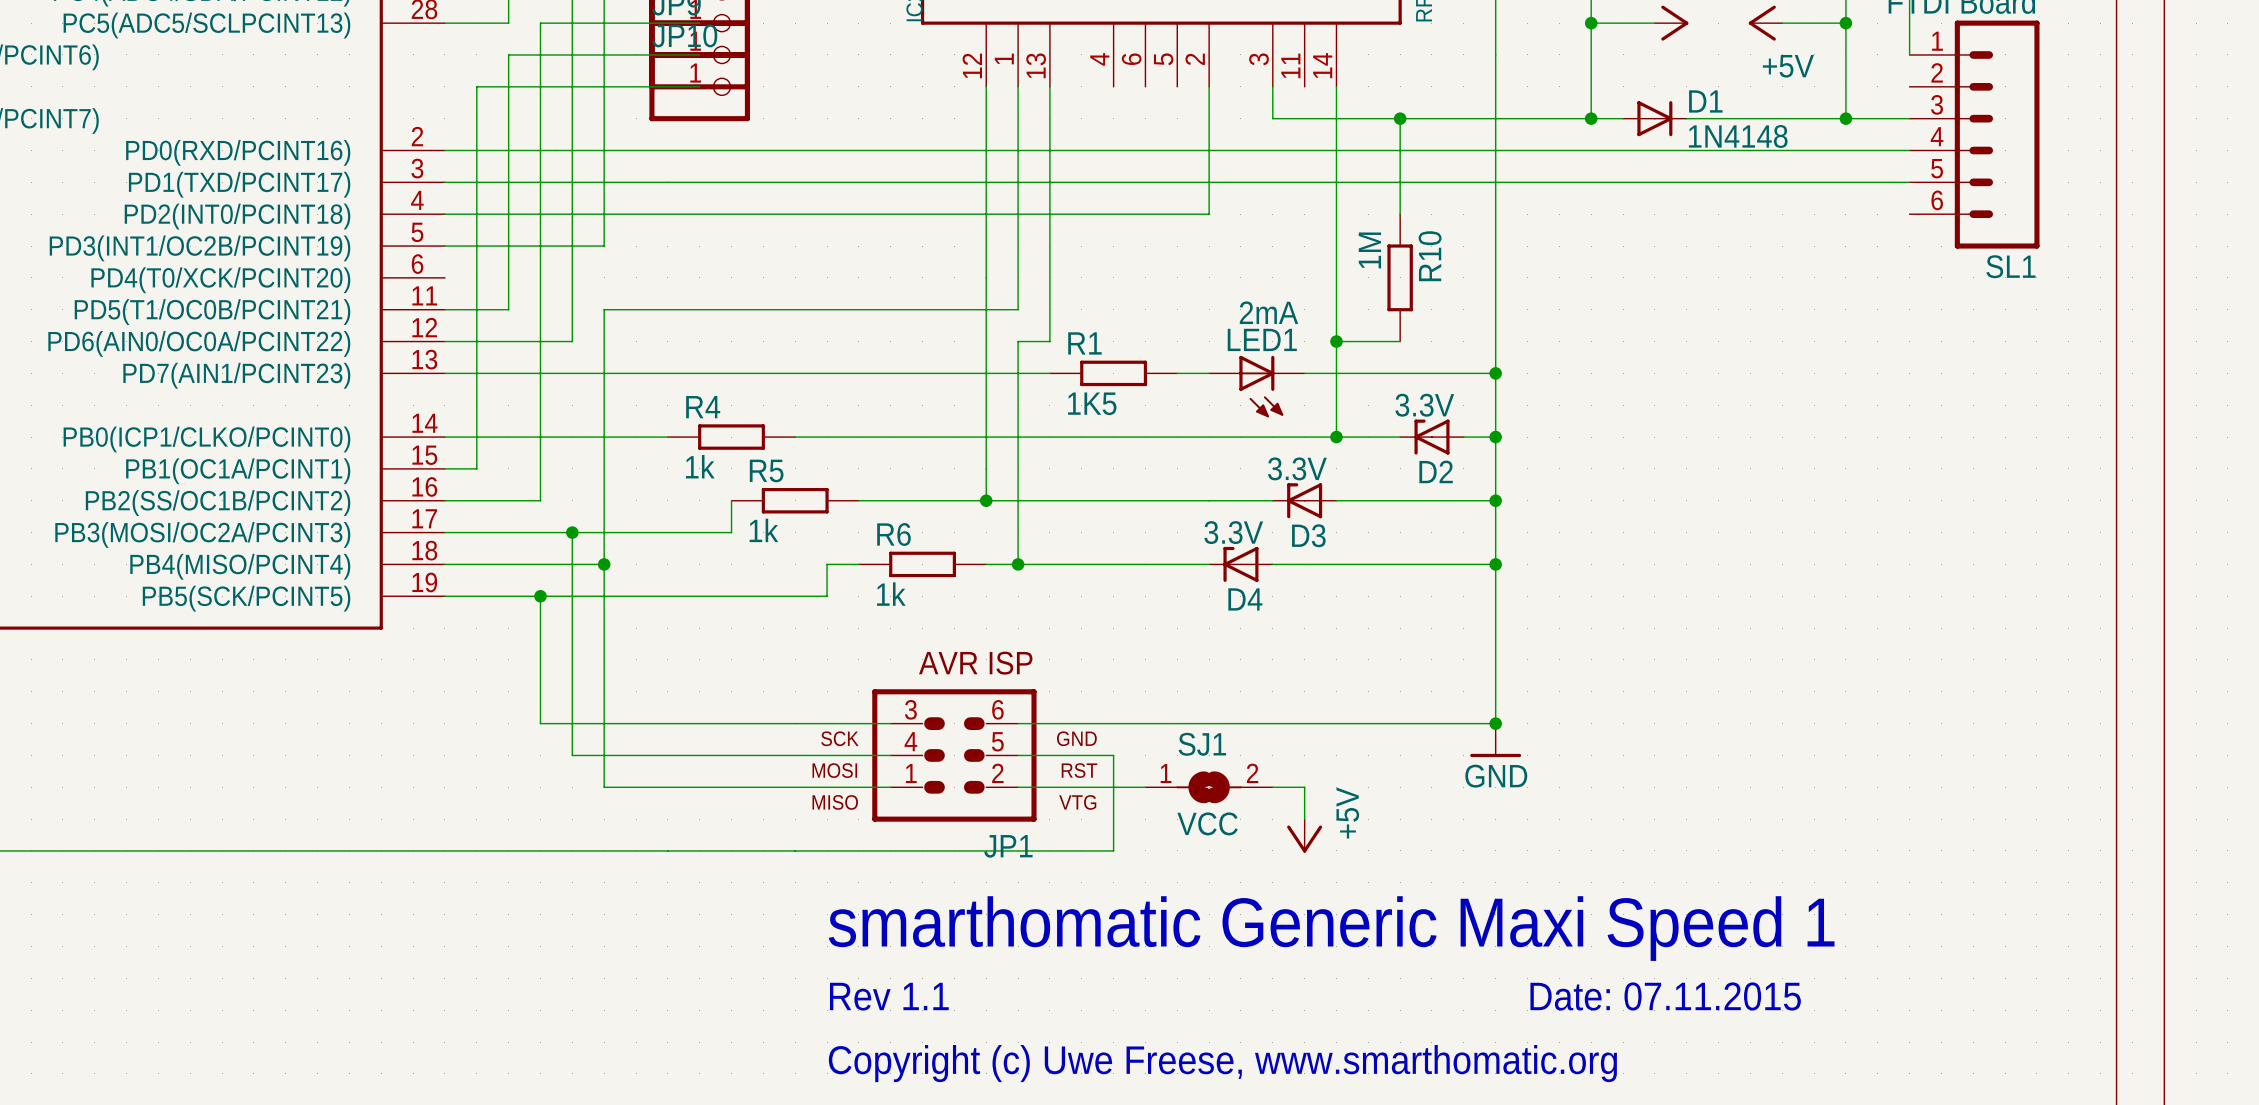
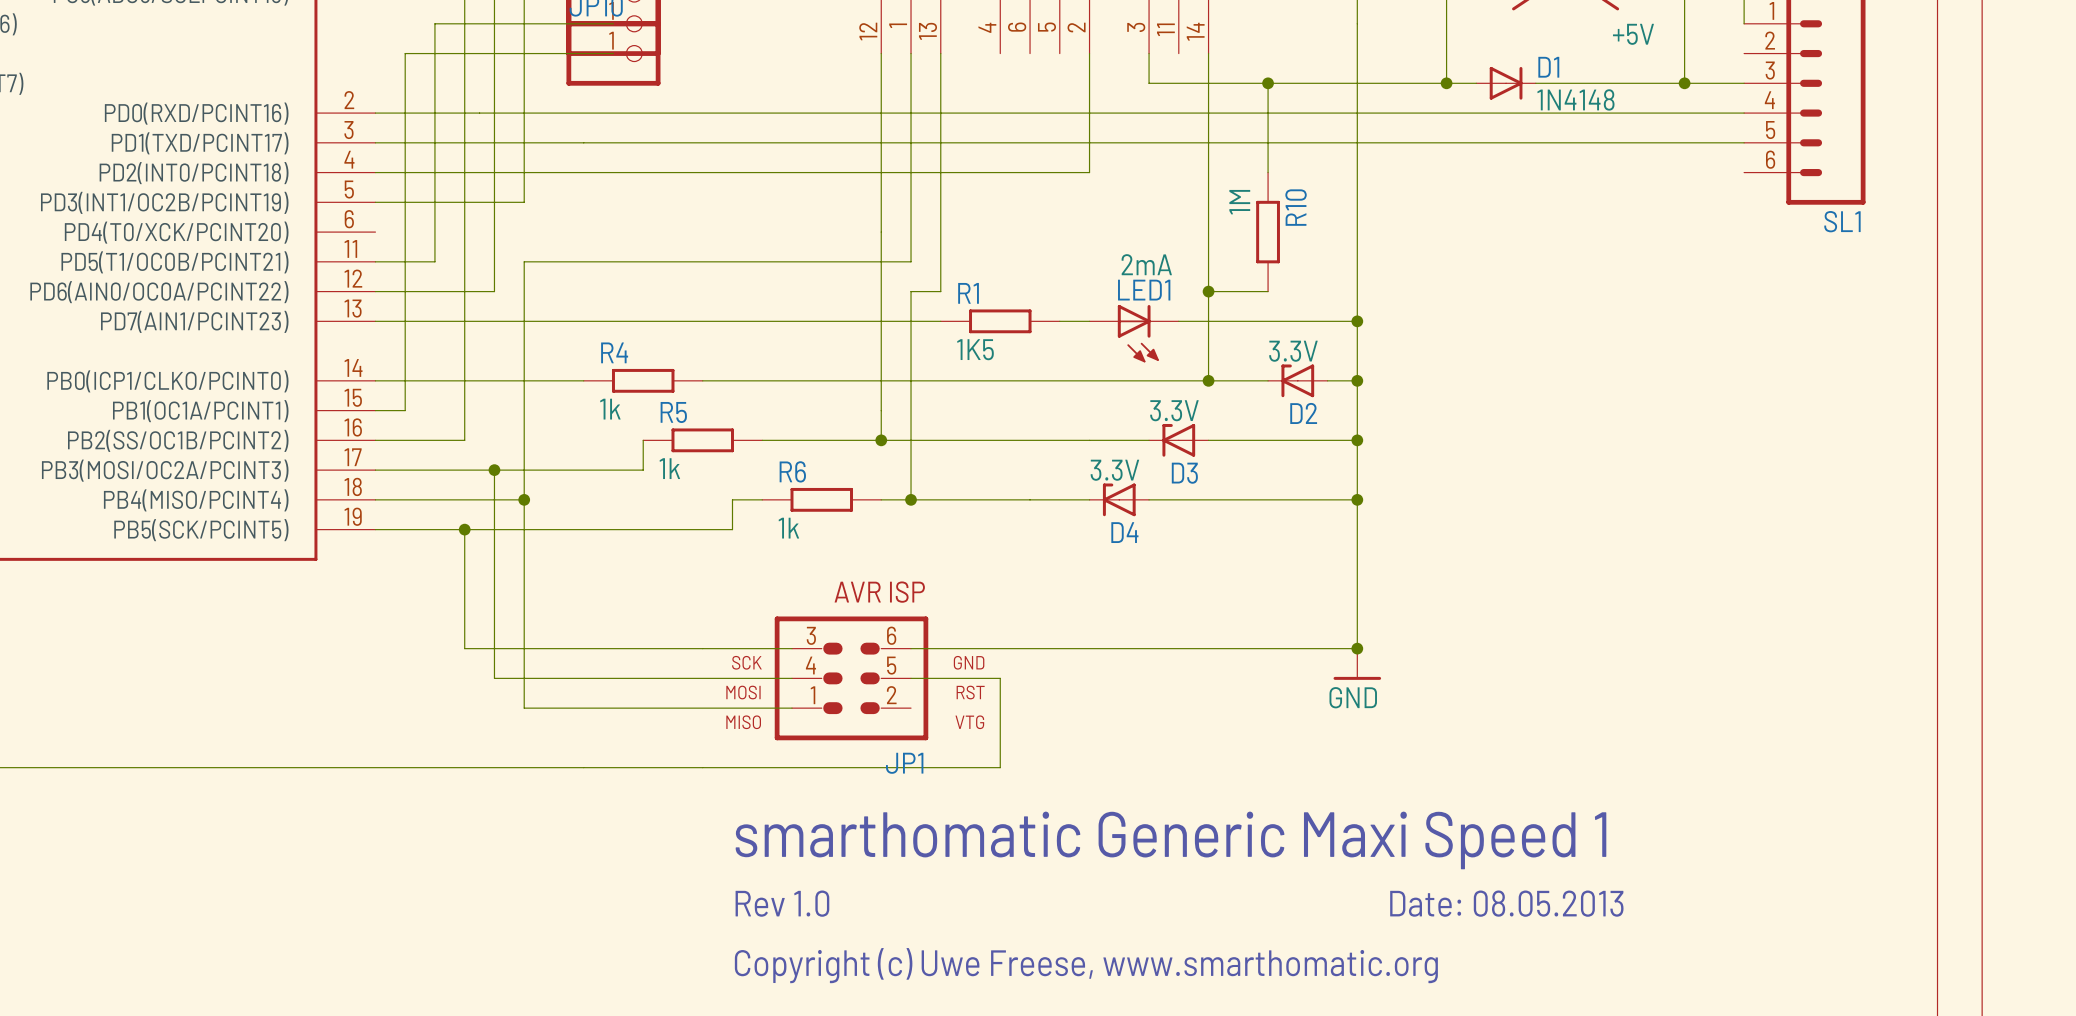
wire: (1018, 787) (1145, 787) -> none
SJ1: VCC (1209, 787) -> none
wire: (1272, 787) (1304, 787) (1304, 819) -> none
power symbol: +5V (1304, 835) -> none
text: Rev 1.1 (889, 996) -> Rev 1.0 (782, 903)
text: Date: 07.11.2015 (1665, 996) -> Date: 08.05.2013 (1506, 903)

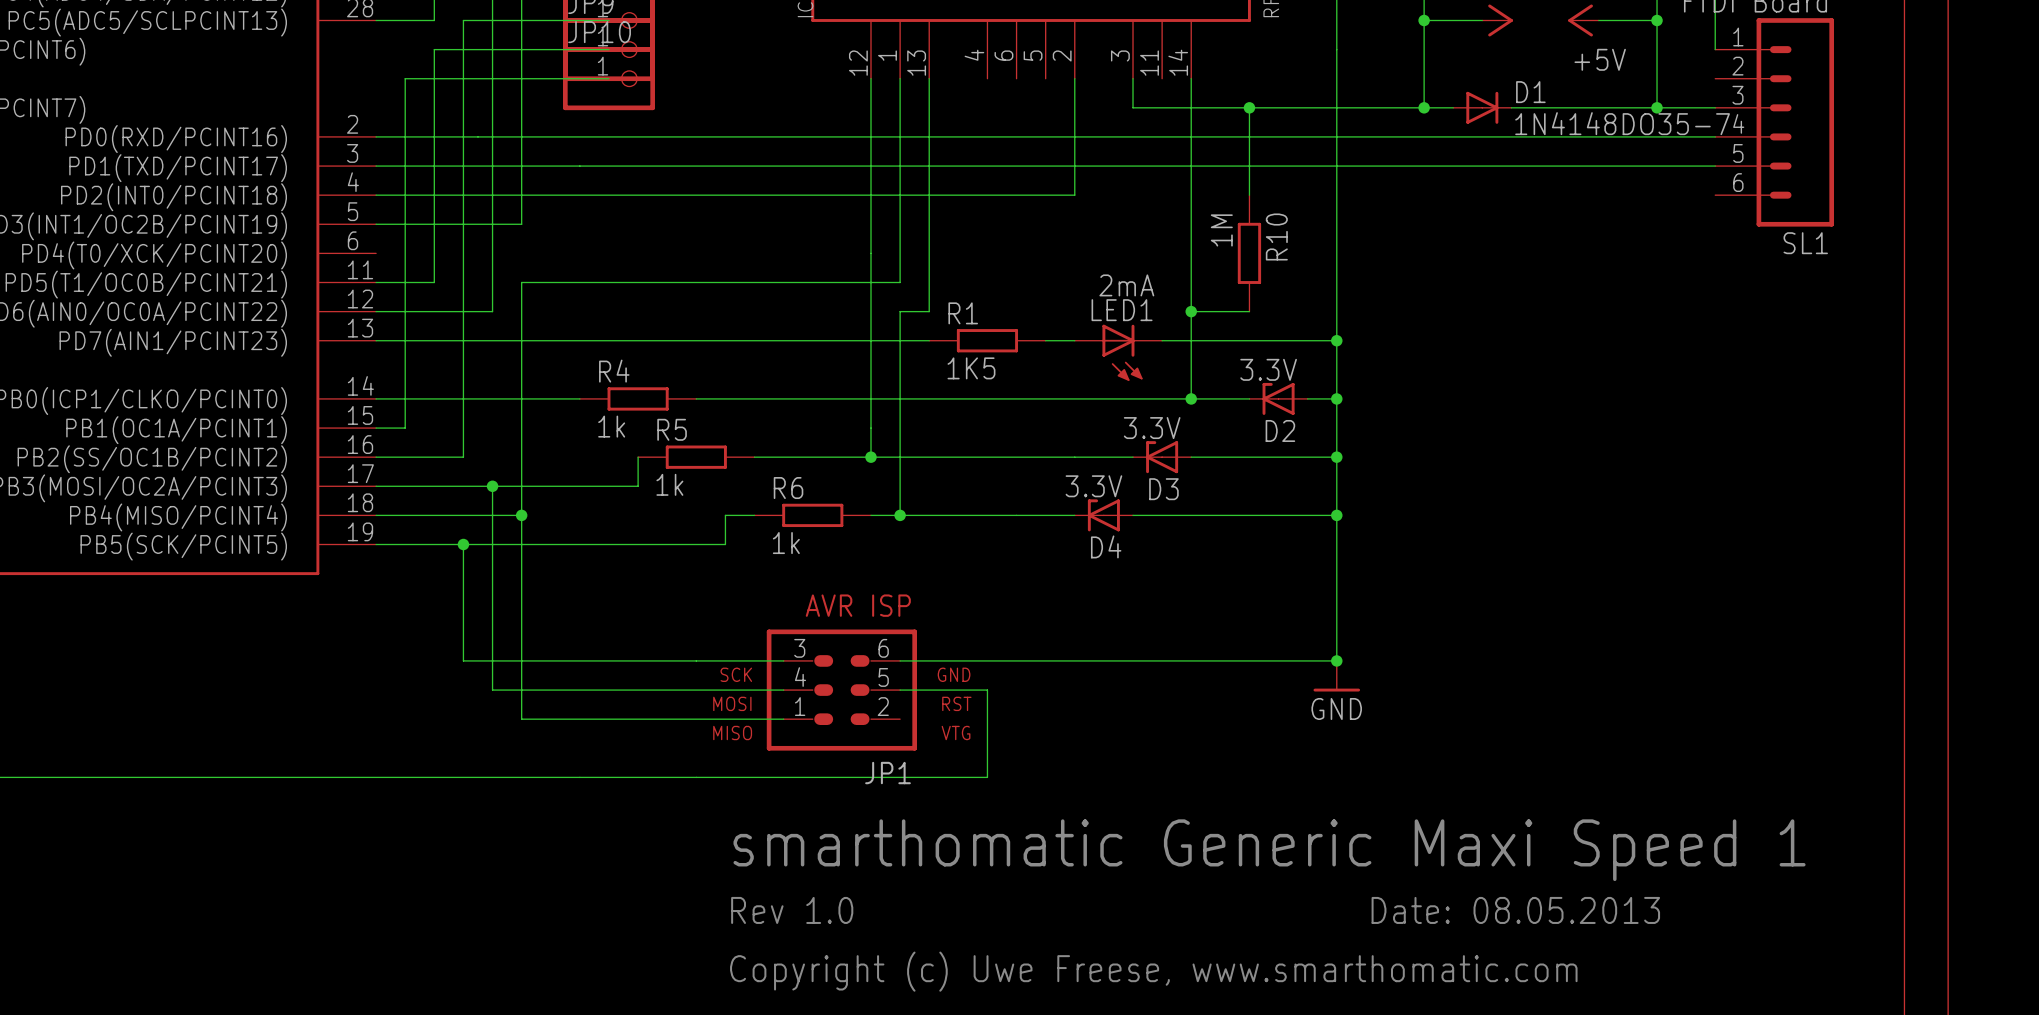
D1 value: 1N4148 (1575, 99) -> 1N4148DO35-7 (1622, 123)
text: Copyright (c) Uwe Freese, www.smarthomatic.org (1086, 965) -> Copyright (c) Uwe Freese, www.smarthomatic.com (1153, 971)

